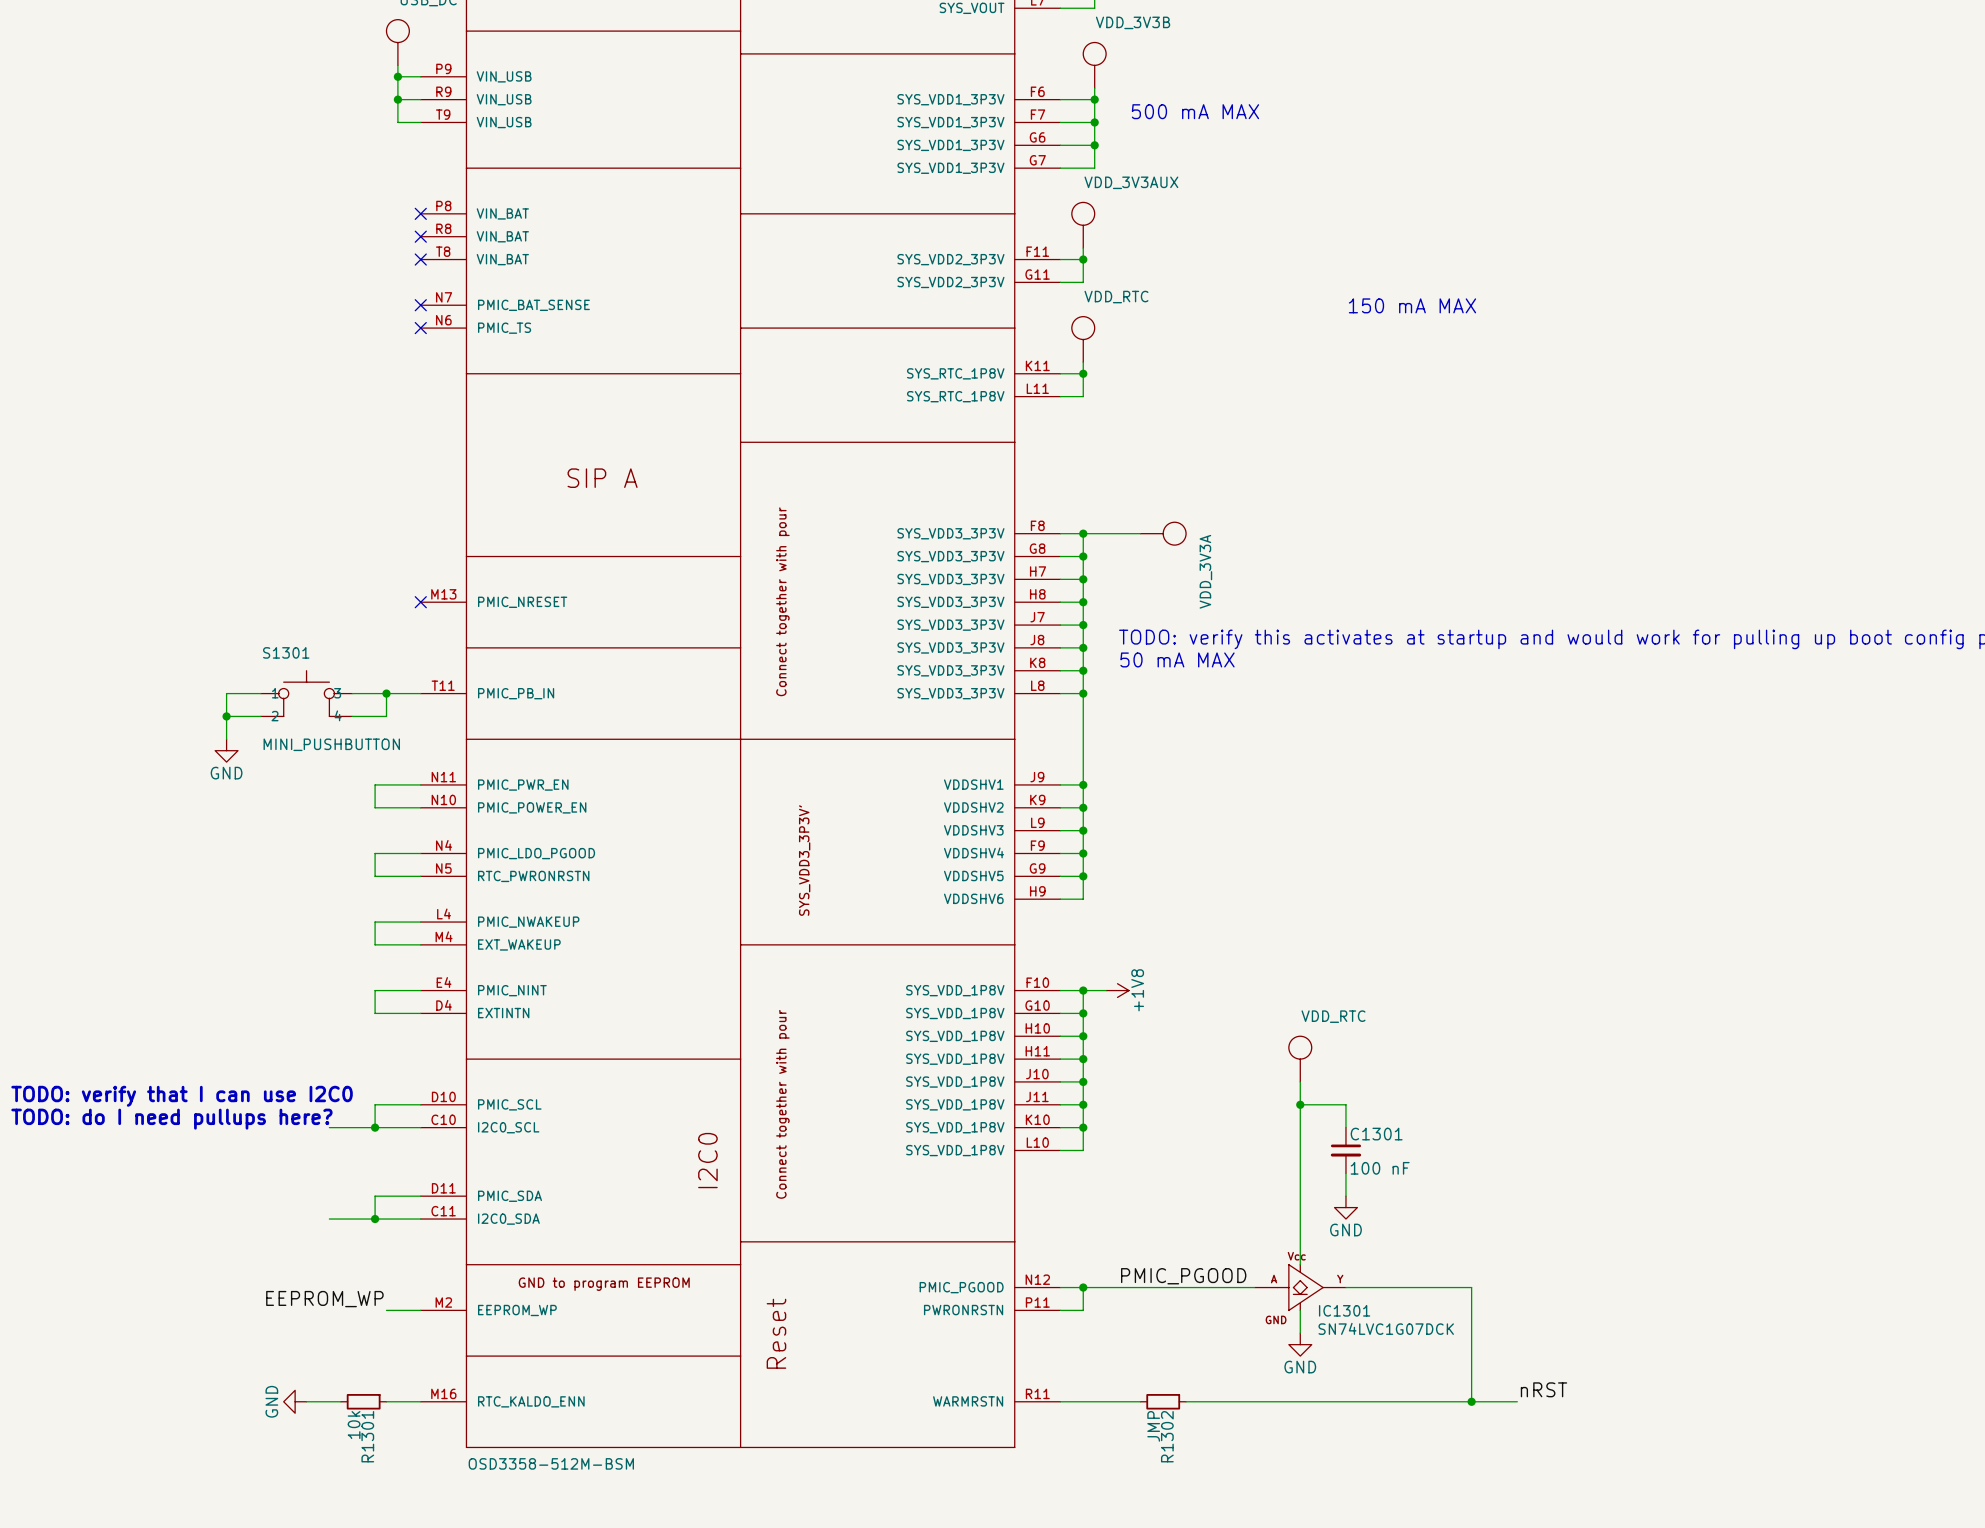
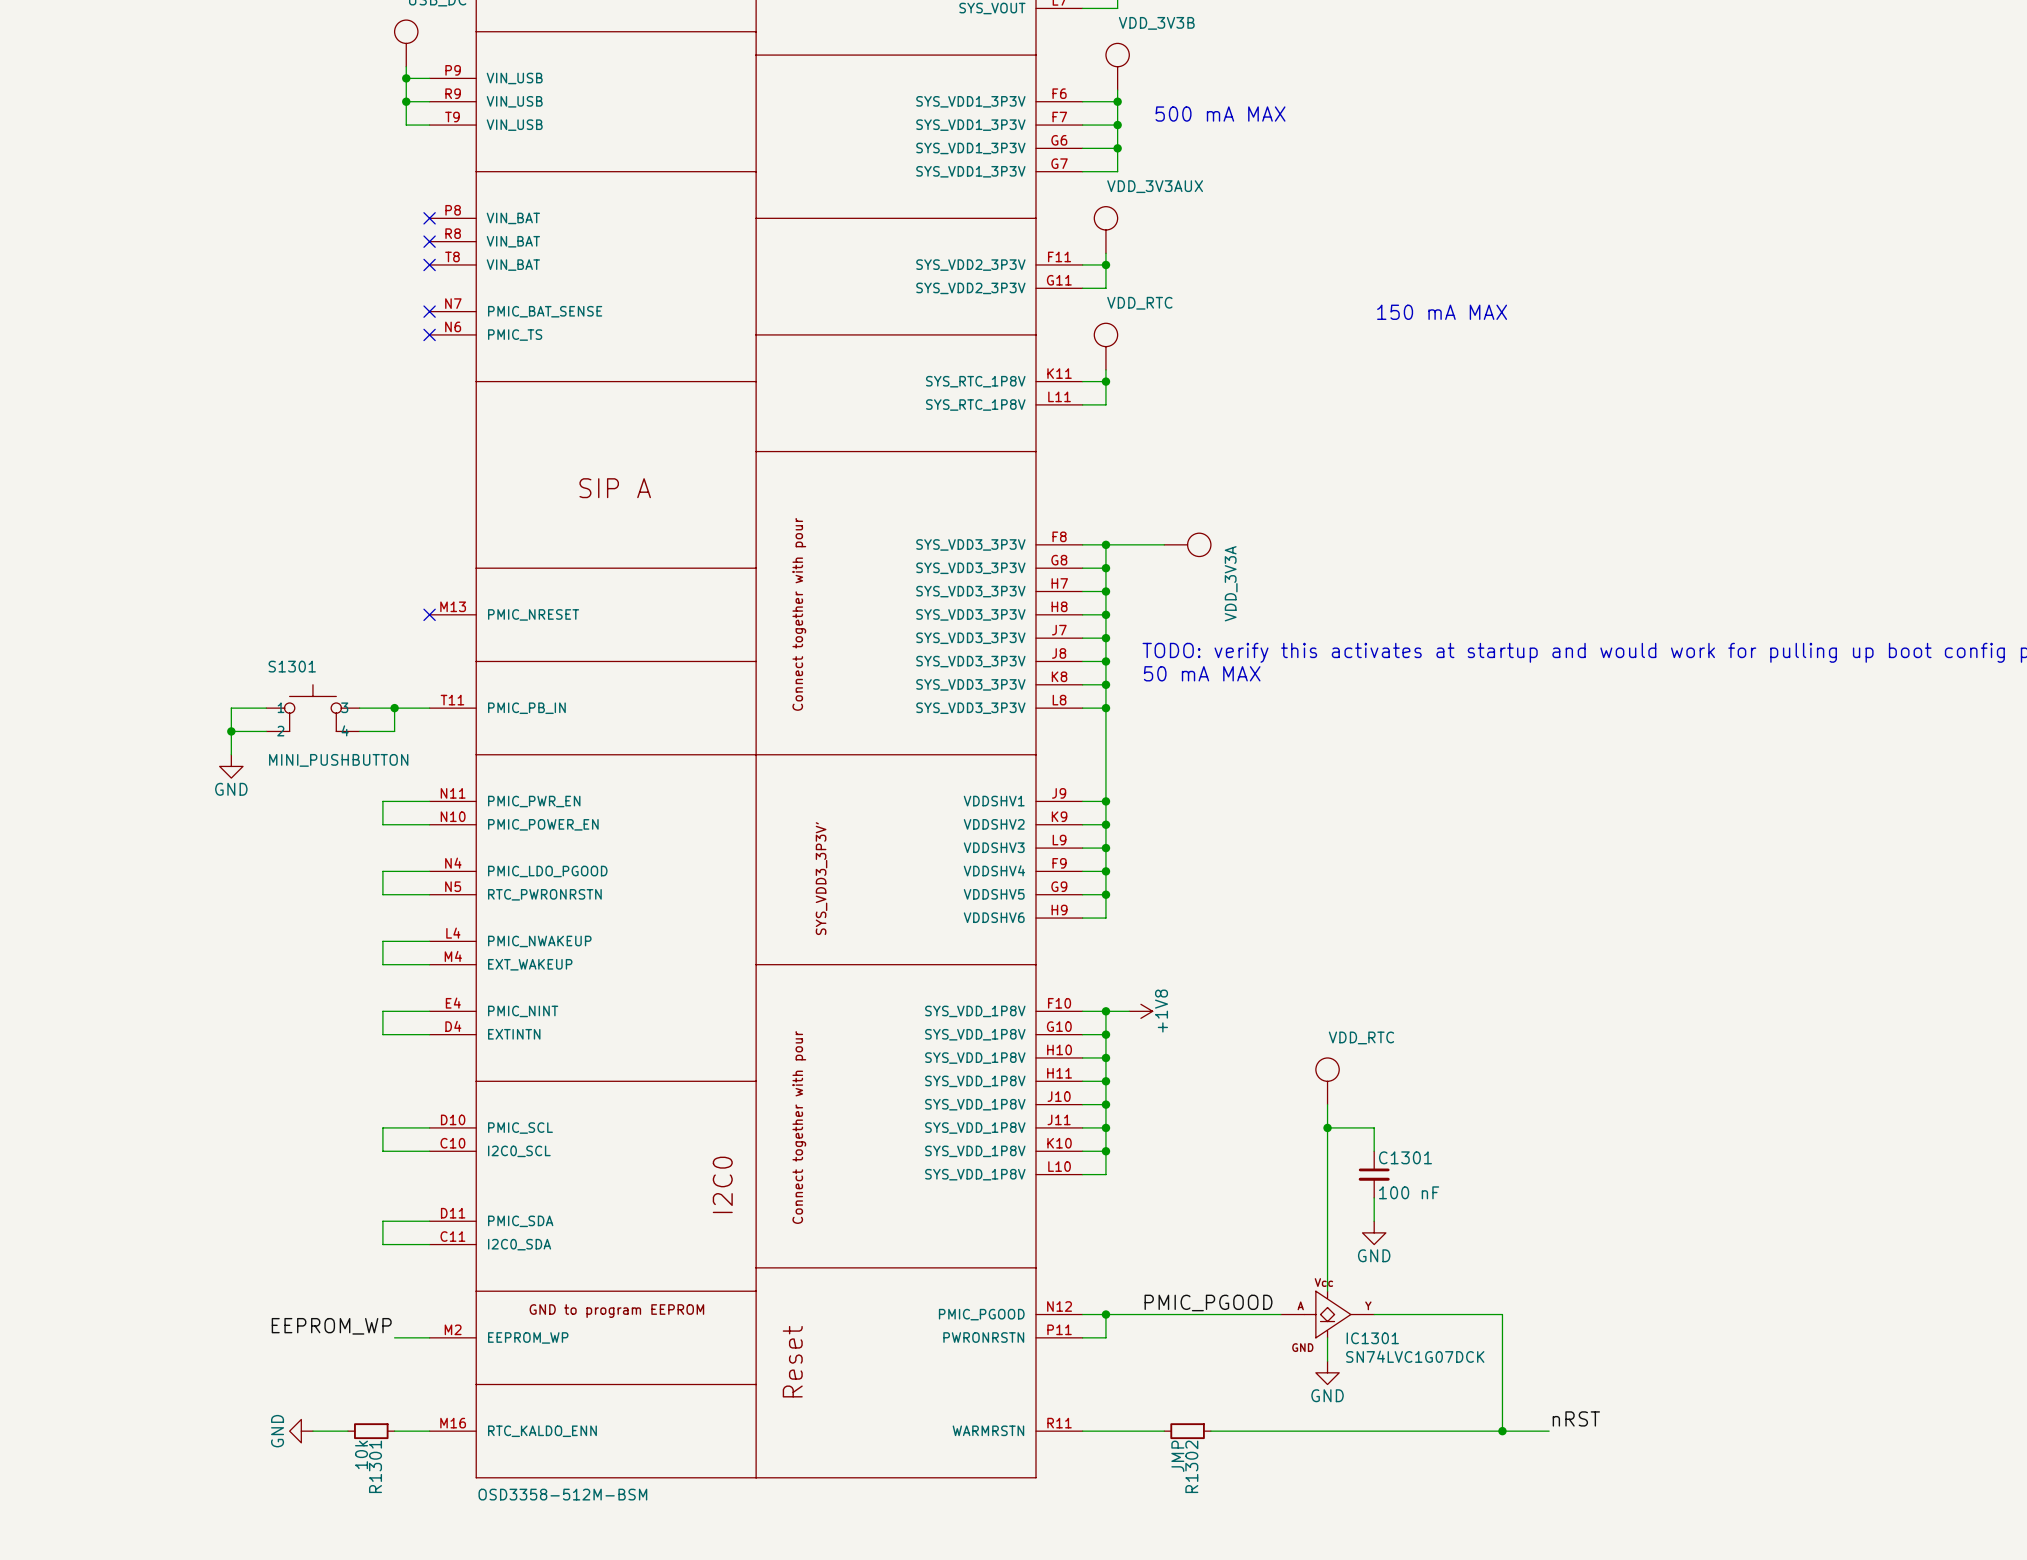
text: TODO: verify that I can use I2C0 (182, 1096) -> none
text: TODO: do I need pullups here? (171, 1119) -> none
wire: (329, 1127) (375, 1127) -> none
junction: (375, 1127) -> none
wire: (329, 1219) (375, 1219) -> none
junction: (375, 1219) -> none

